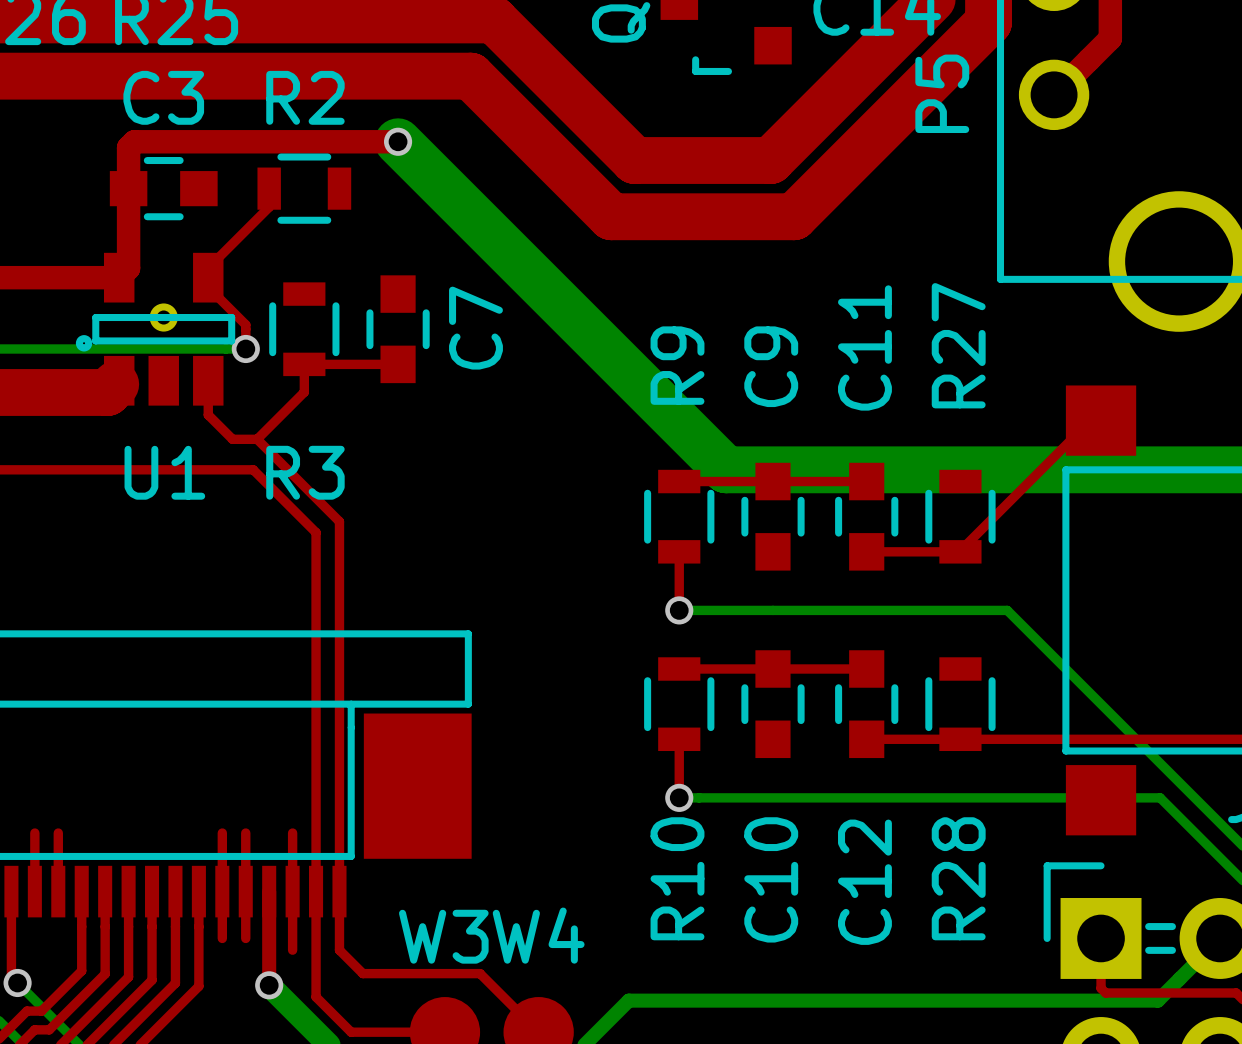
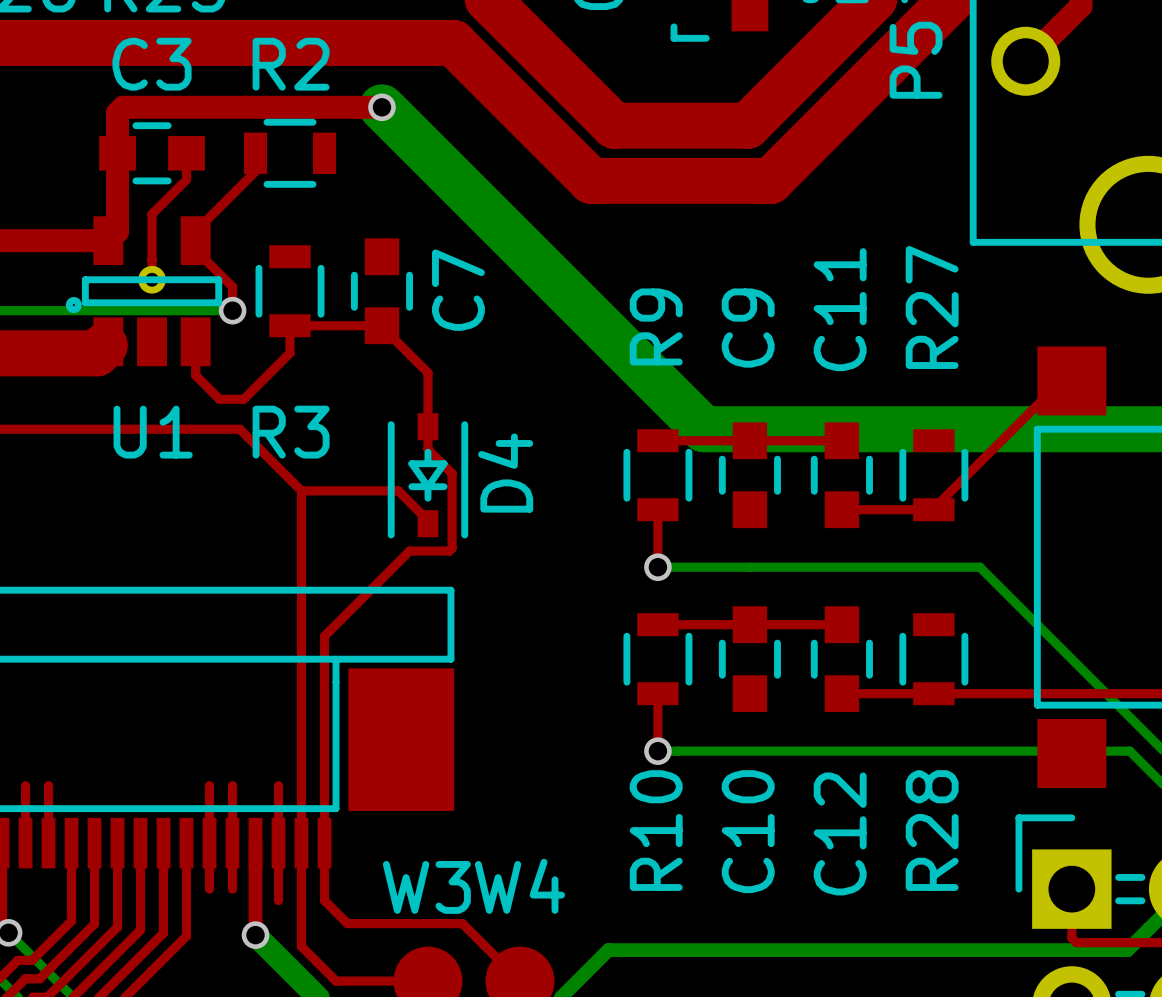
top track: none -> (186, 153) (186, 179) (152, 214) (152, 279)
top track: (257, 439) (339, 521) (339, 680) -> (381, 325) (427, 372) (427, 449) (452, 473) (452, 548) (449, 551) (409, 551) (324, 636)
D4: none -> (427, 475)
top track: none -> (301, 490) (398, 490) (427, 520) (427, 523)

